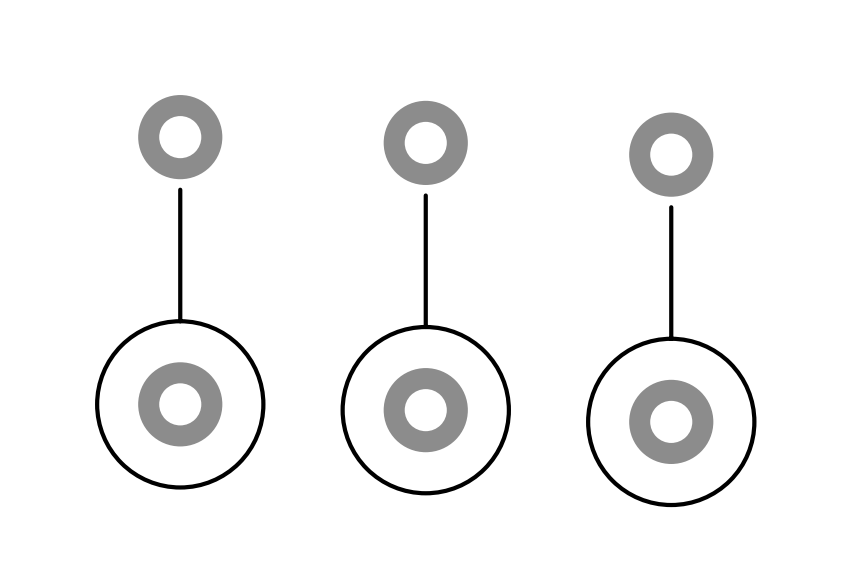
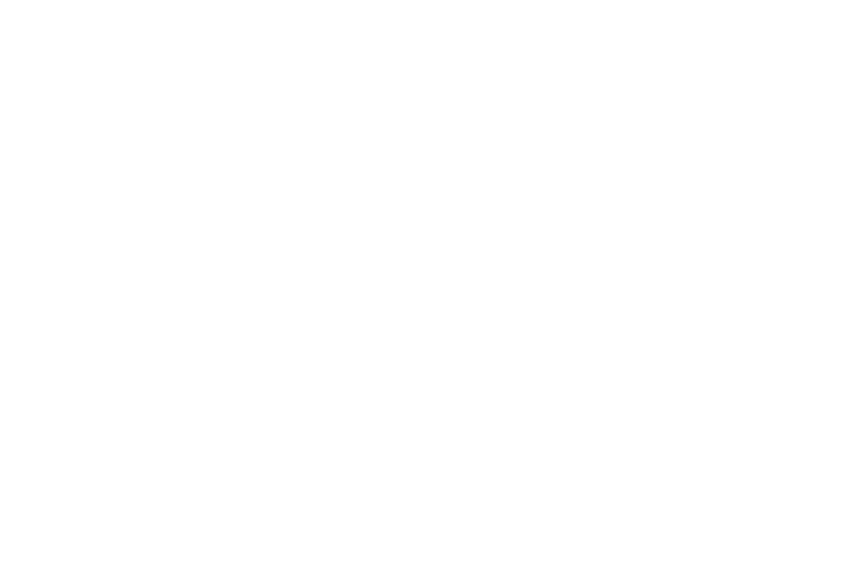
part: (180, 292) -> none
part: (425, 298) -> none
part: (671, 309) -> none

